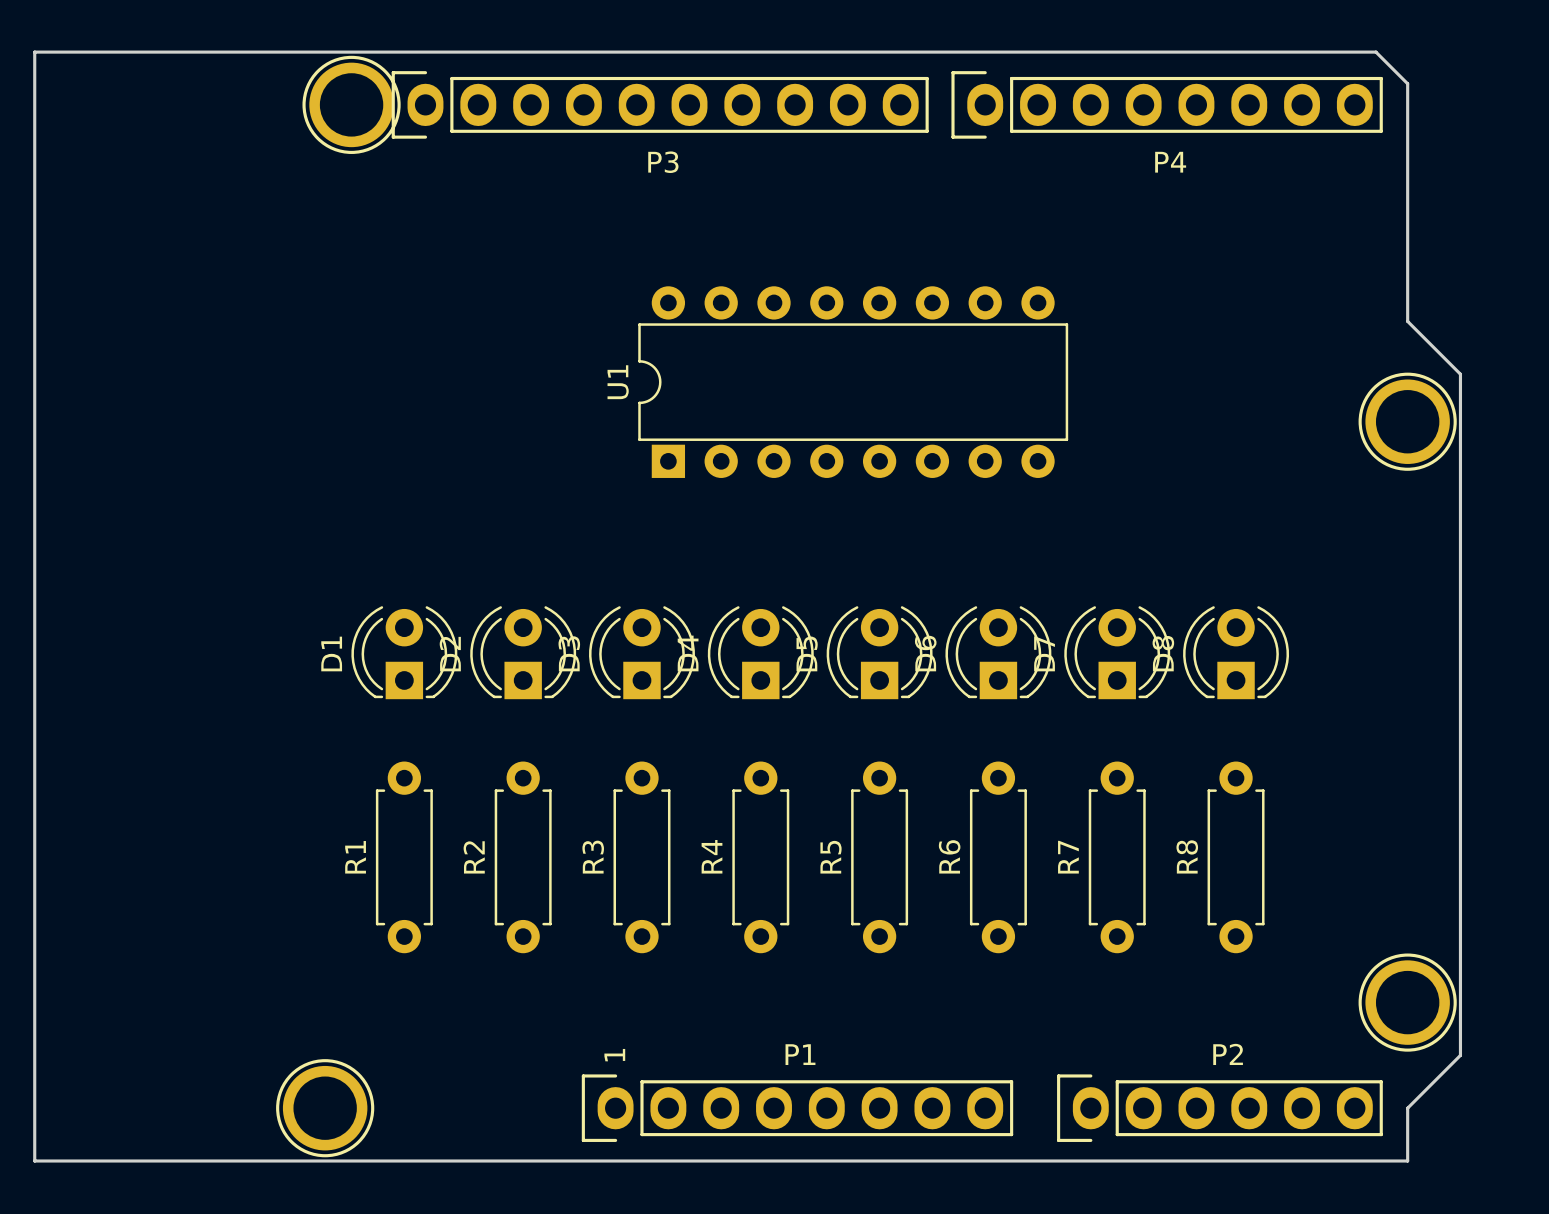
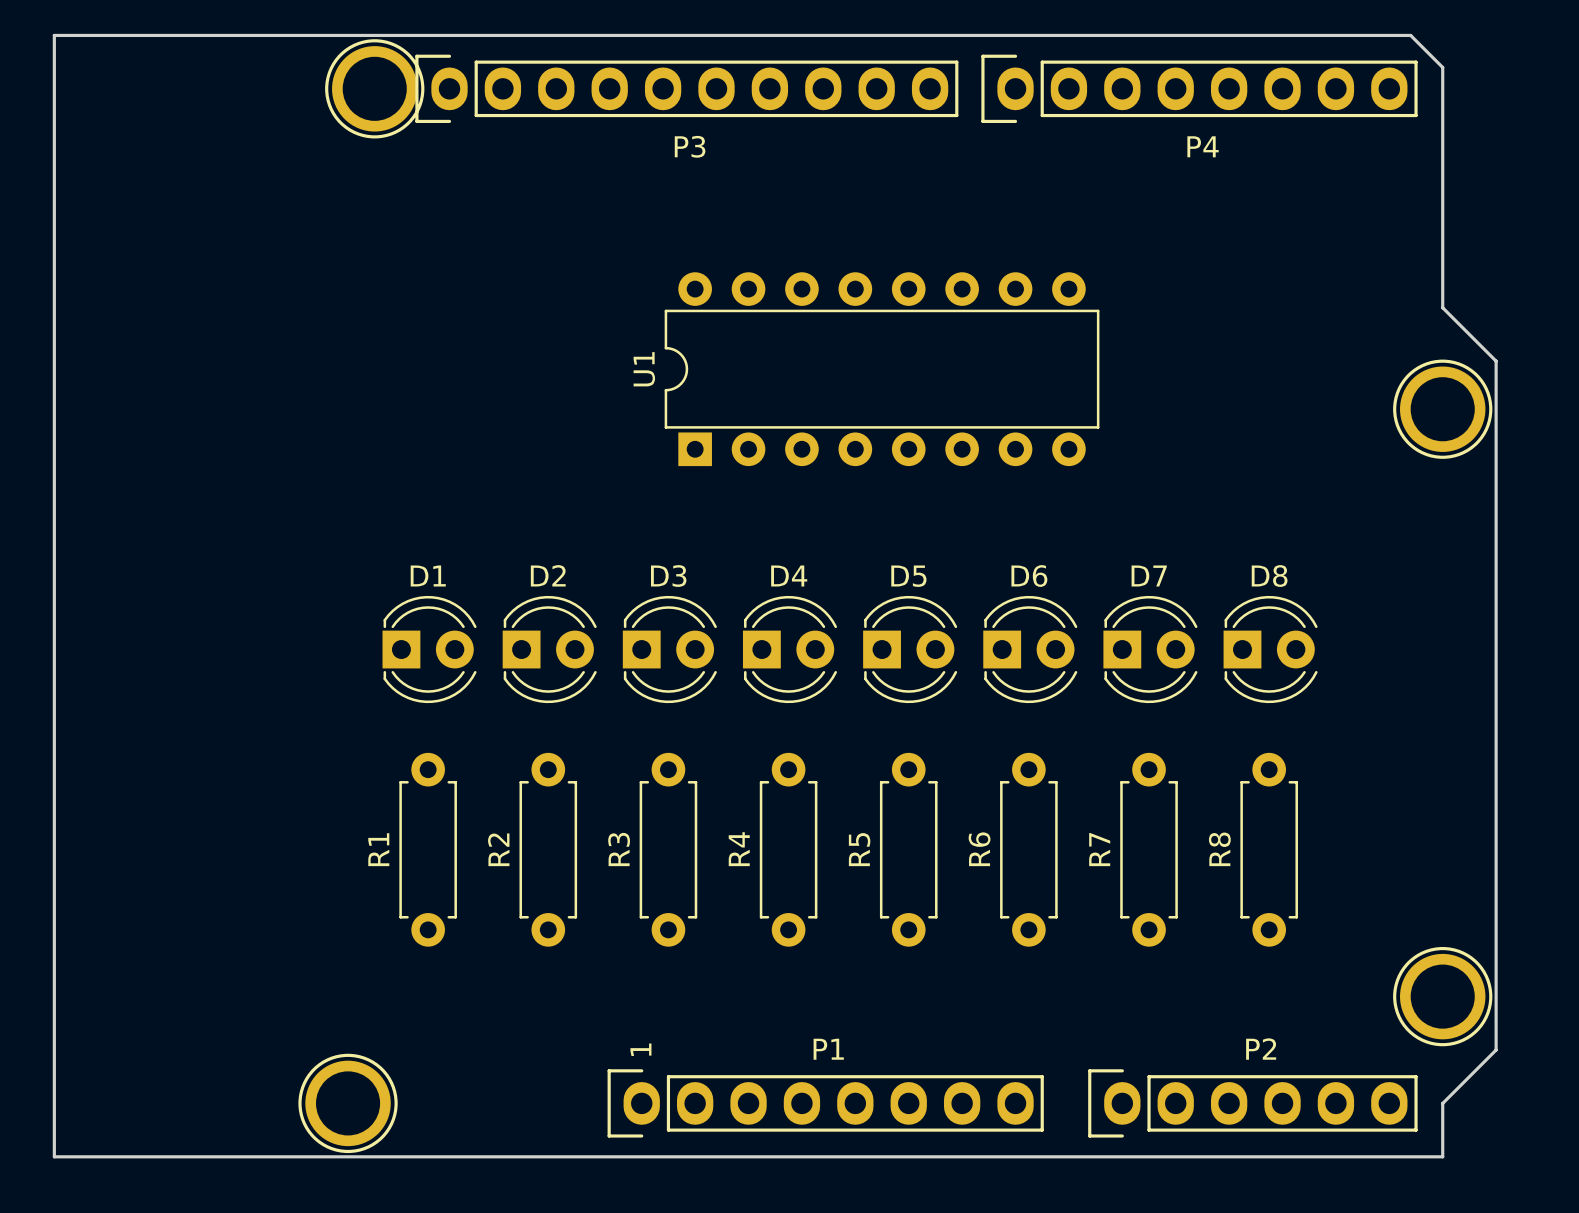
D1 rotation: 0° (404, 652) -> 90° clockwise (429, 649)
D2 rotation: 0° (523, 652) -> 90° clockwise (549, 649)
D3 rotation: 0° (641, 652) -> 90° clockwise (669, 649)
D4 rotation: 0° (760, 652) -> 90° clockwise (789, 649)
D5 rotation: 0° (879, 652) -> 90° clockwise (910, 649)
D6 rotation: 0° (998, 652) -> 90° clockwise (1030, 649)
D7 rotation: 0° (1117, 652) -> 90° clockwise (1150, 649)
D8 rotation: 0° (1236, 652) -> 90° clockwise (1270, 649)

